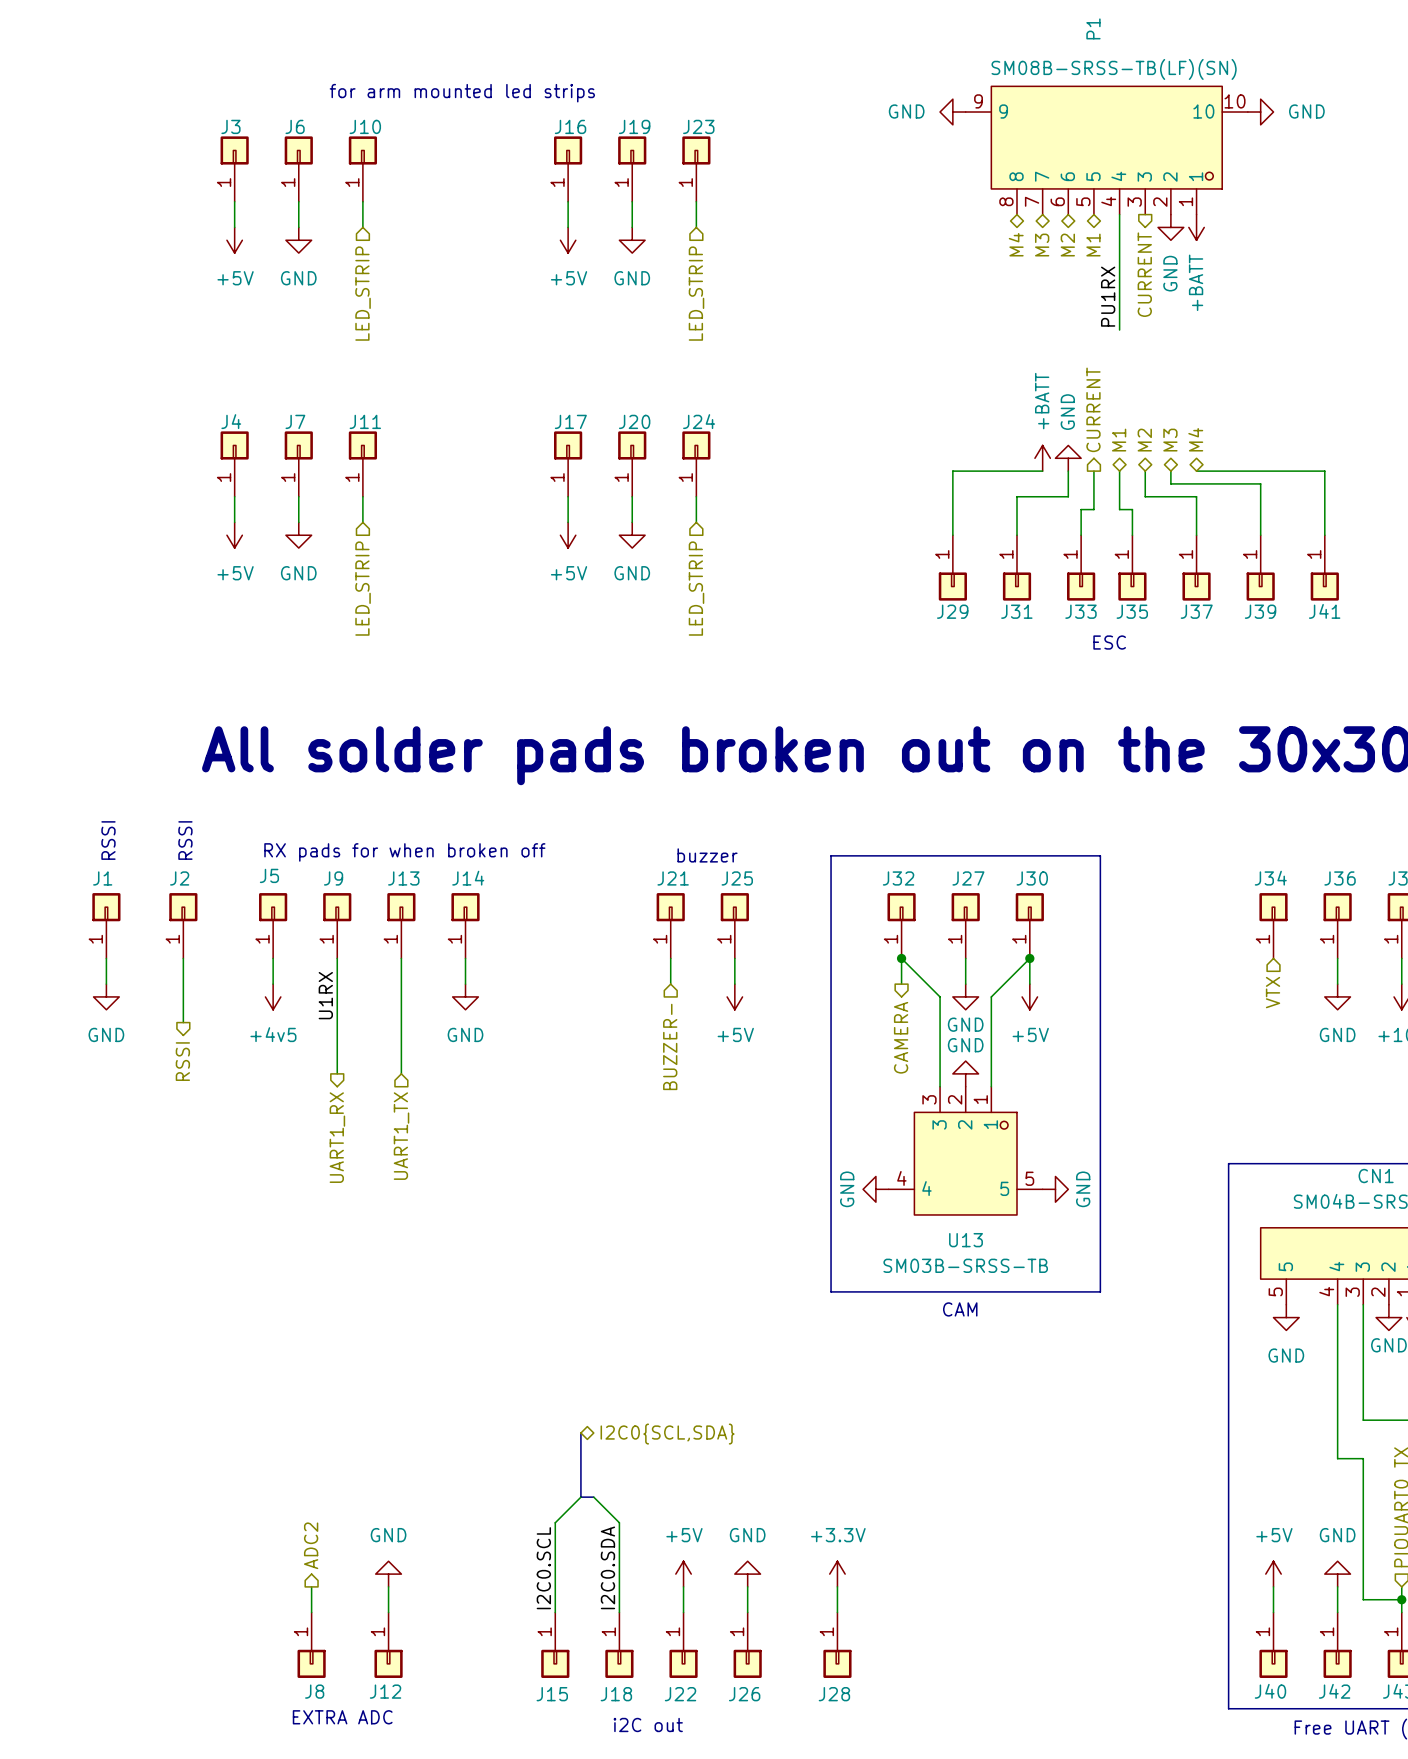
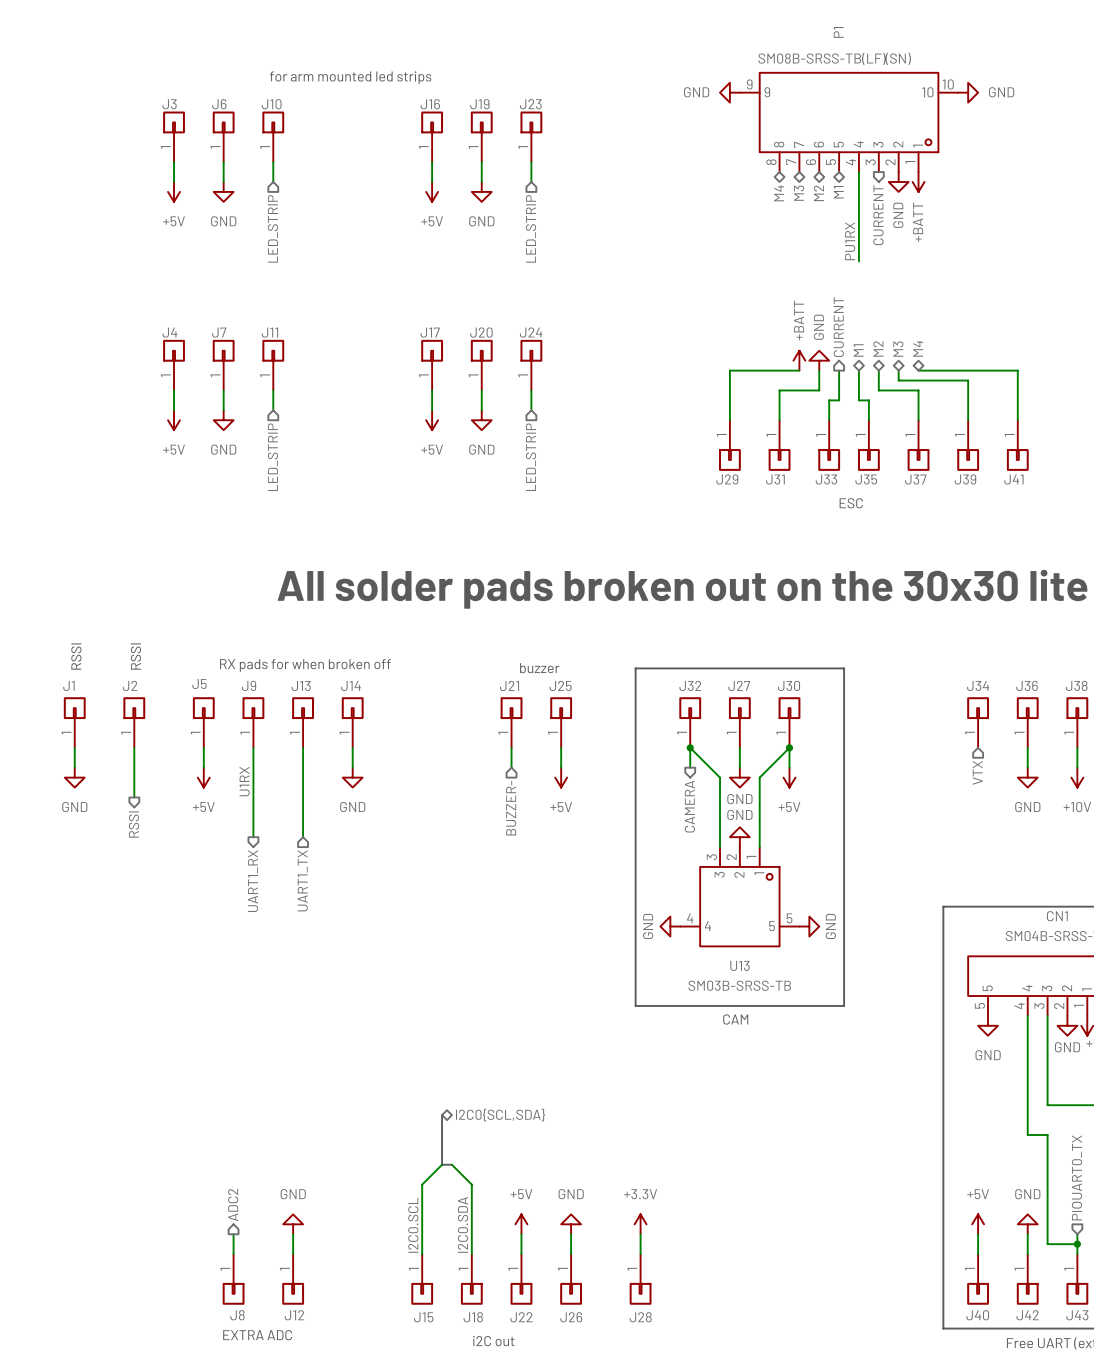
power symbol: +4v5 (273, 996) -> +5V (203, 777)

